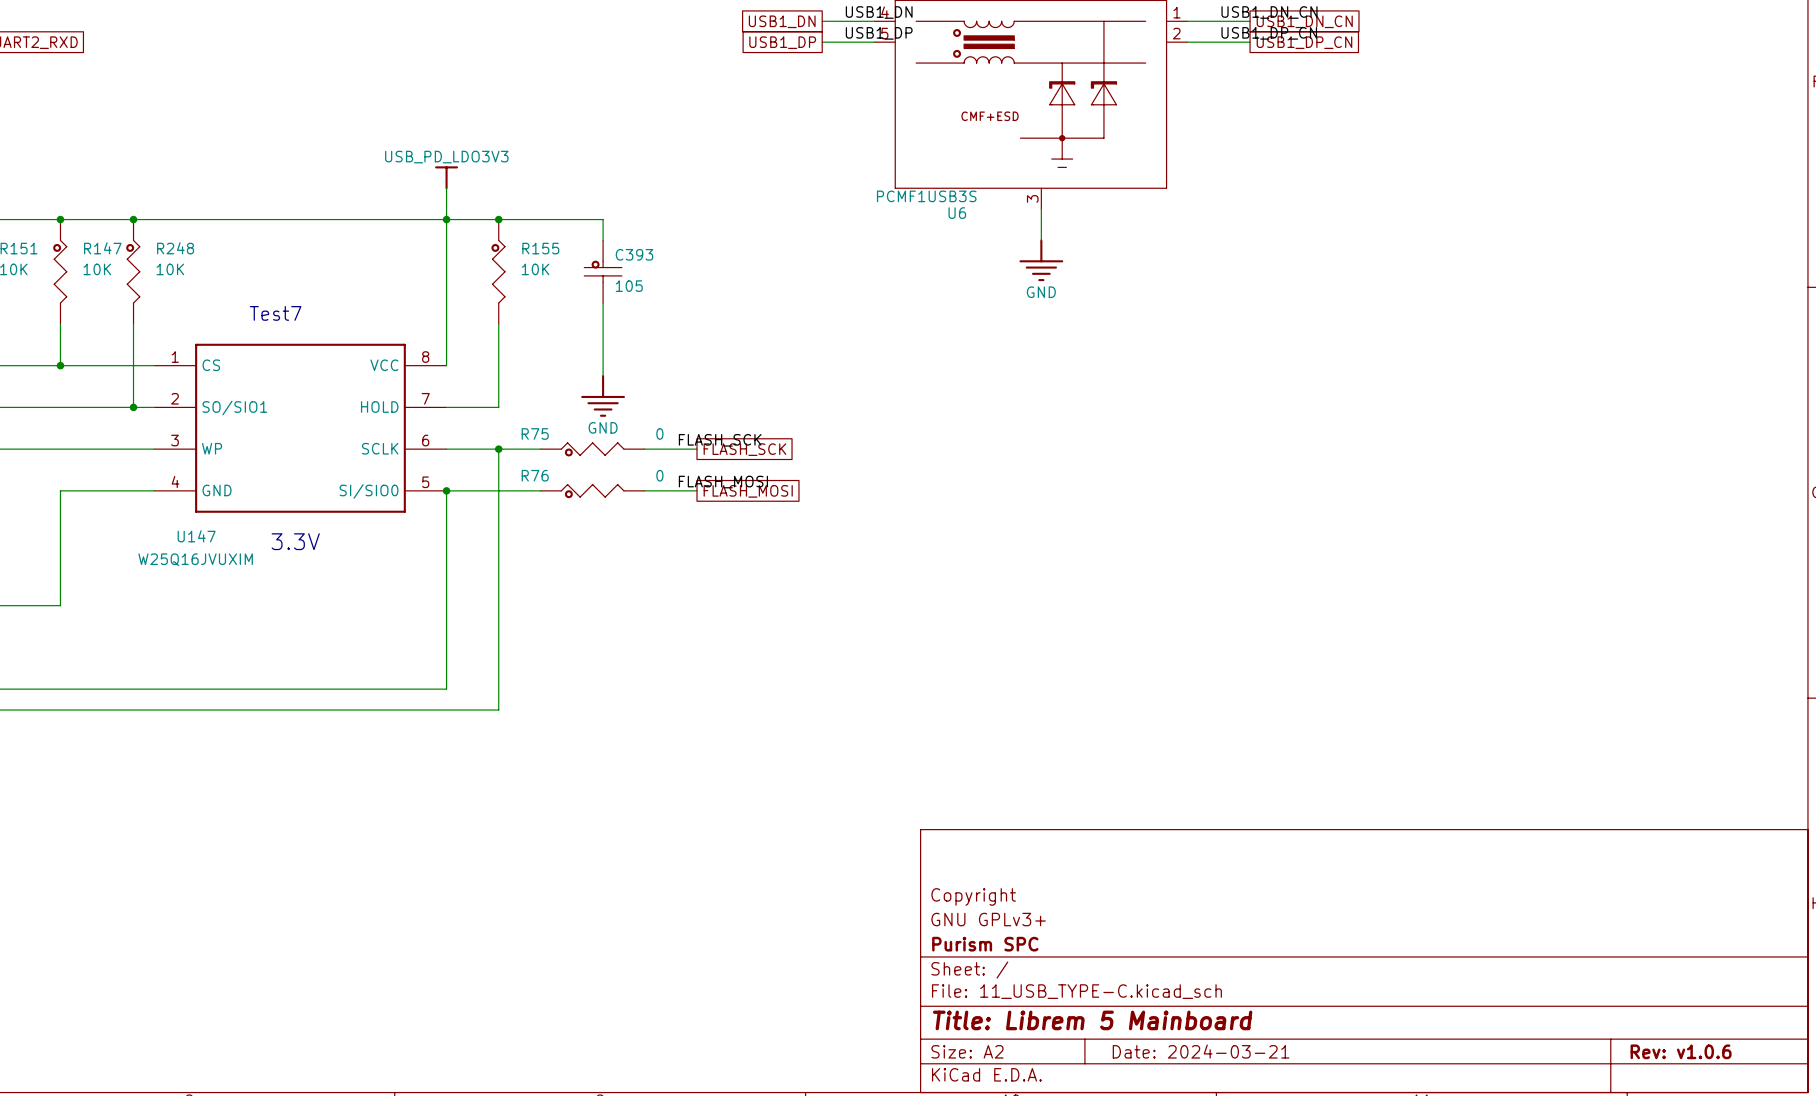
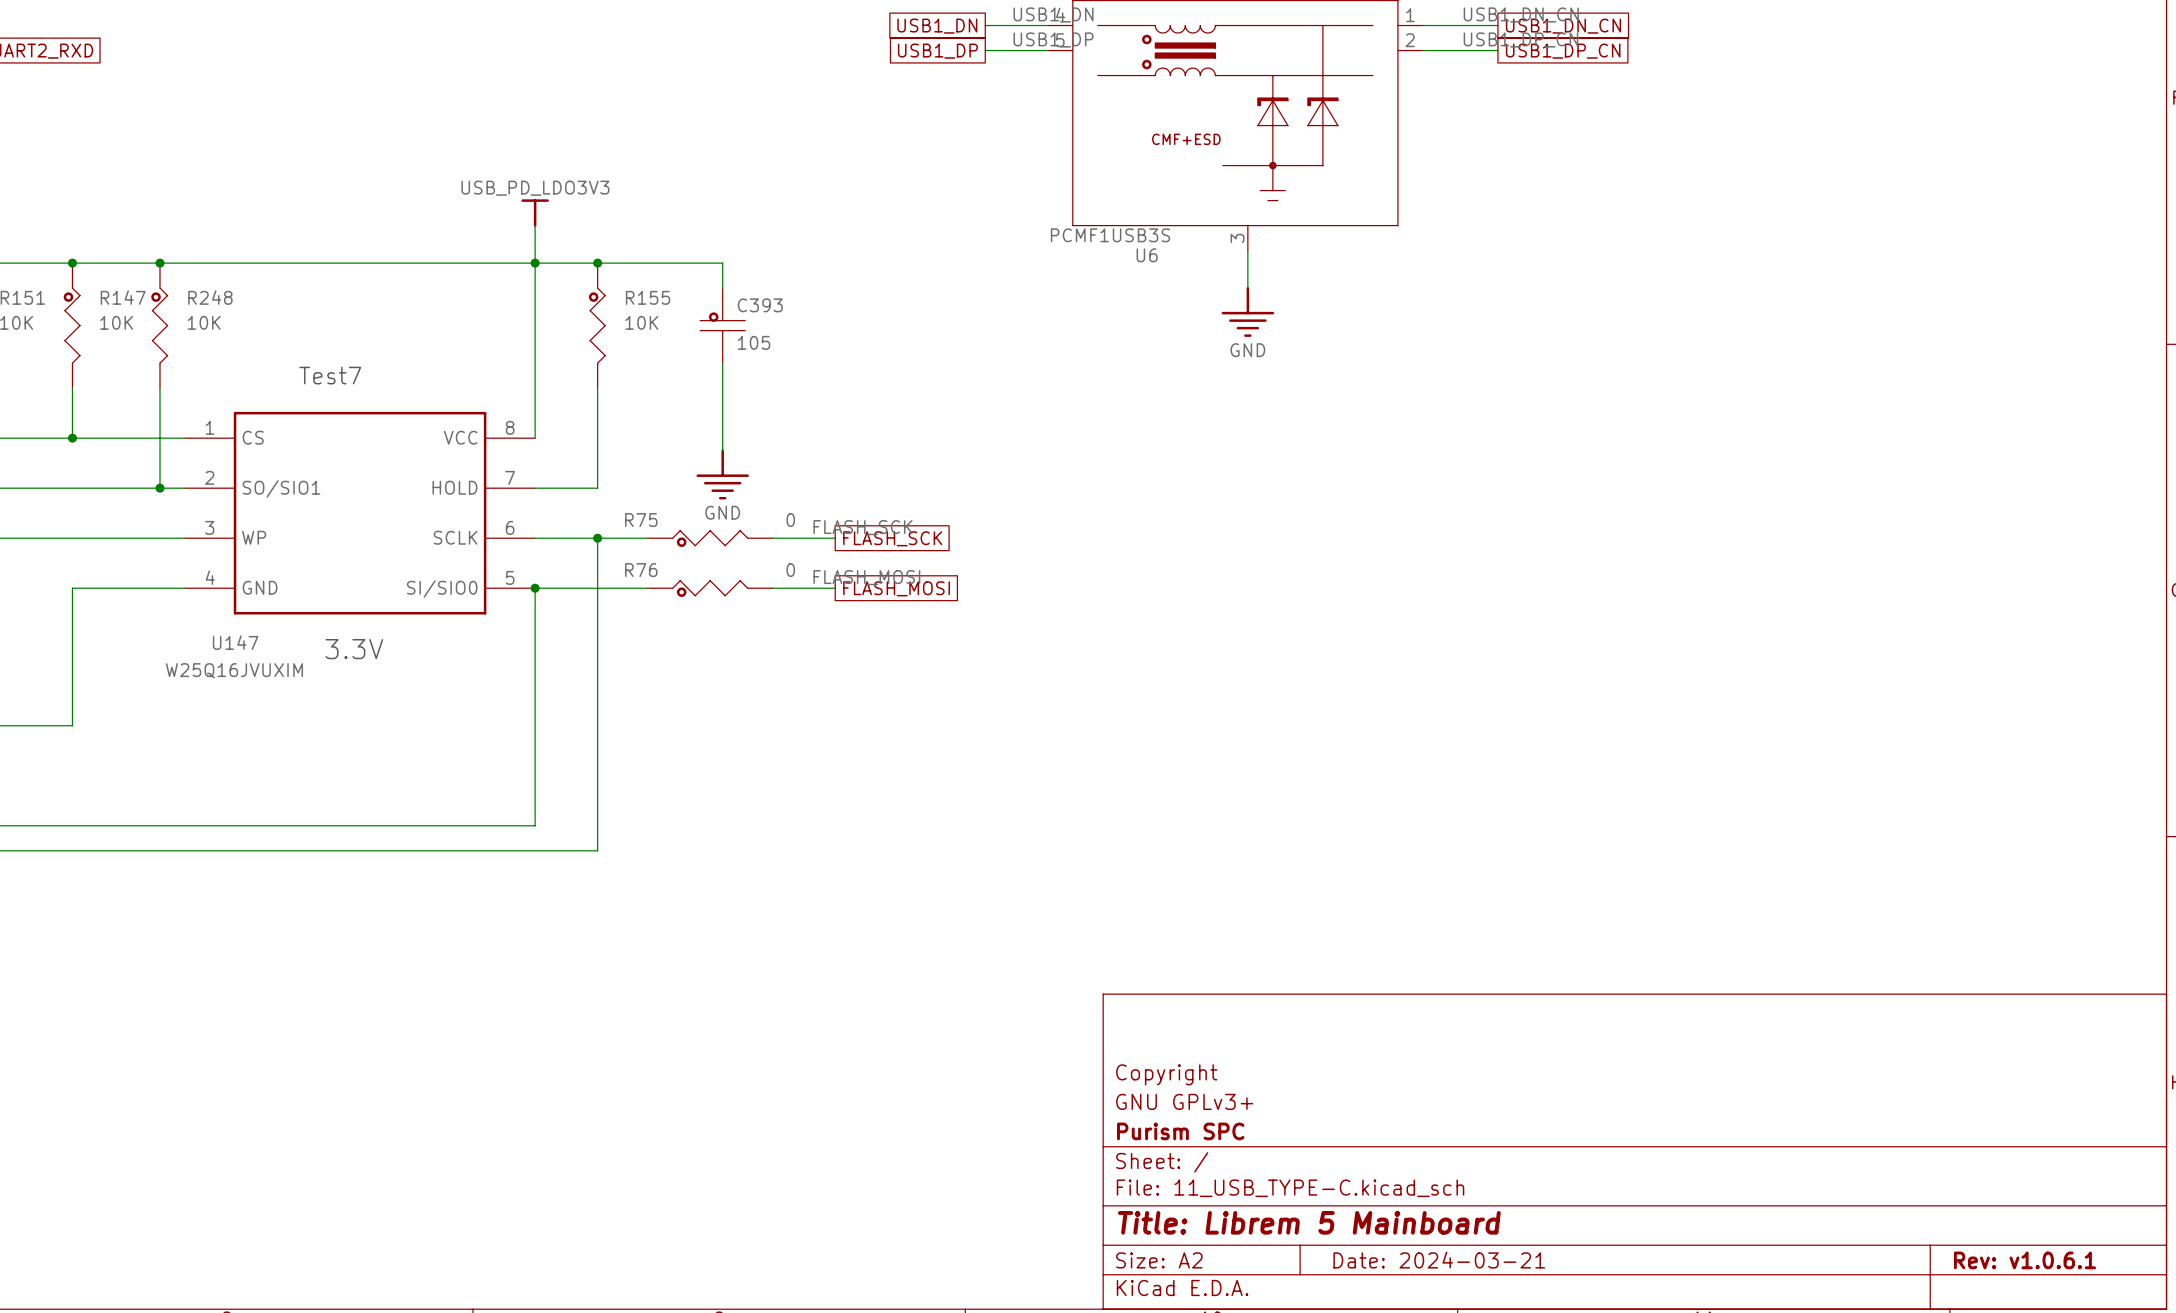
title block: Rev: v1.0.6 (1681, 1051) -> Rev: v1.0.6.1 (2025, 1260)

